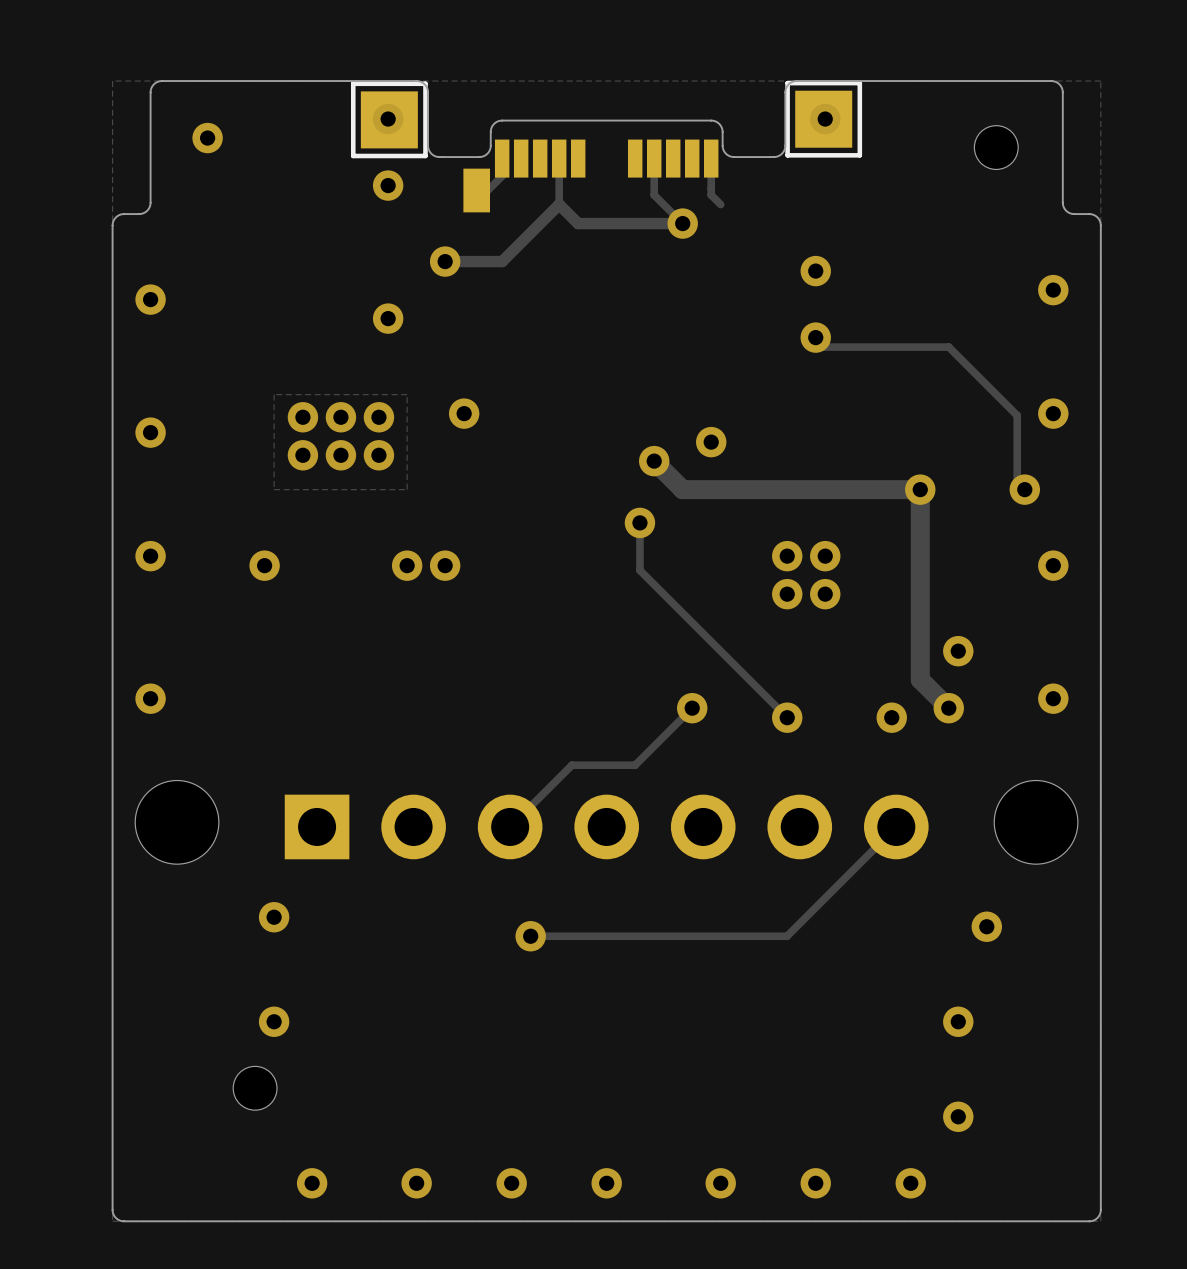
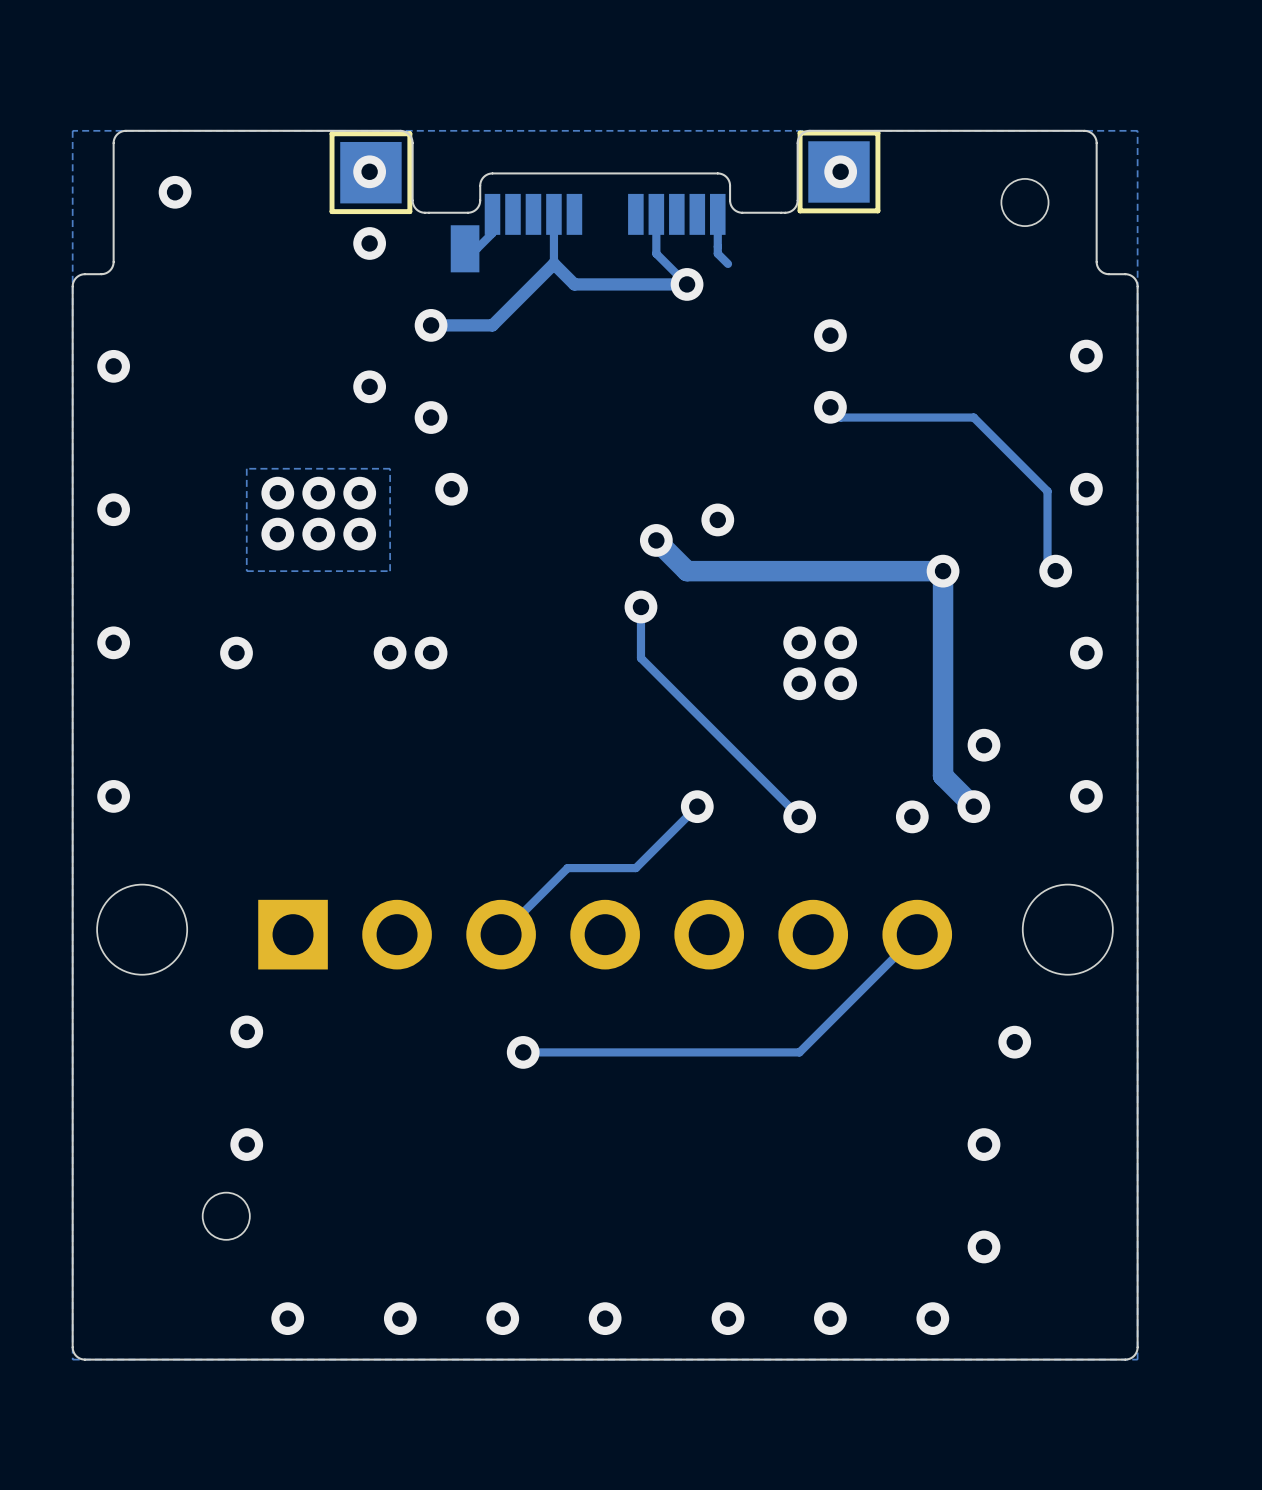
via: none -> (431, 417)

